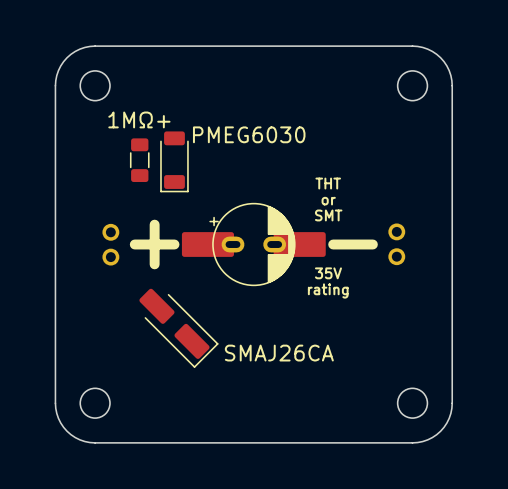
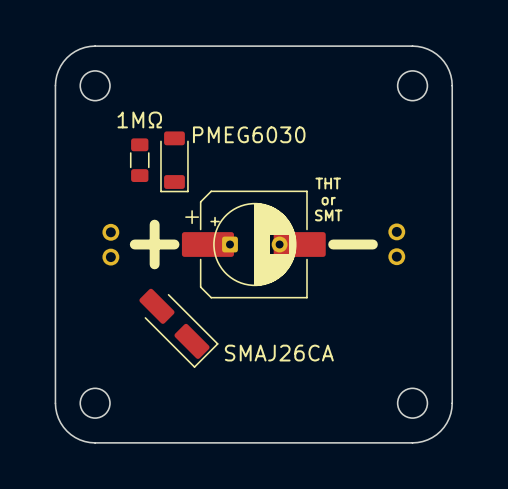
text: 1MΩ+ (139, 119) -> 1MΩ (139, 119)
part footprint: [181, 203, 326, 286] -> [181, 190, 326, 299]
part: none -> (253, 244)
text: 35V (328, 273) -> none
text: rating (328, 290) -> none

